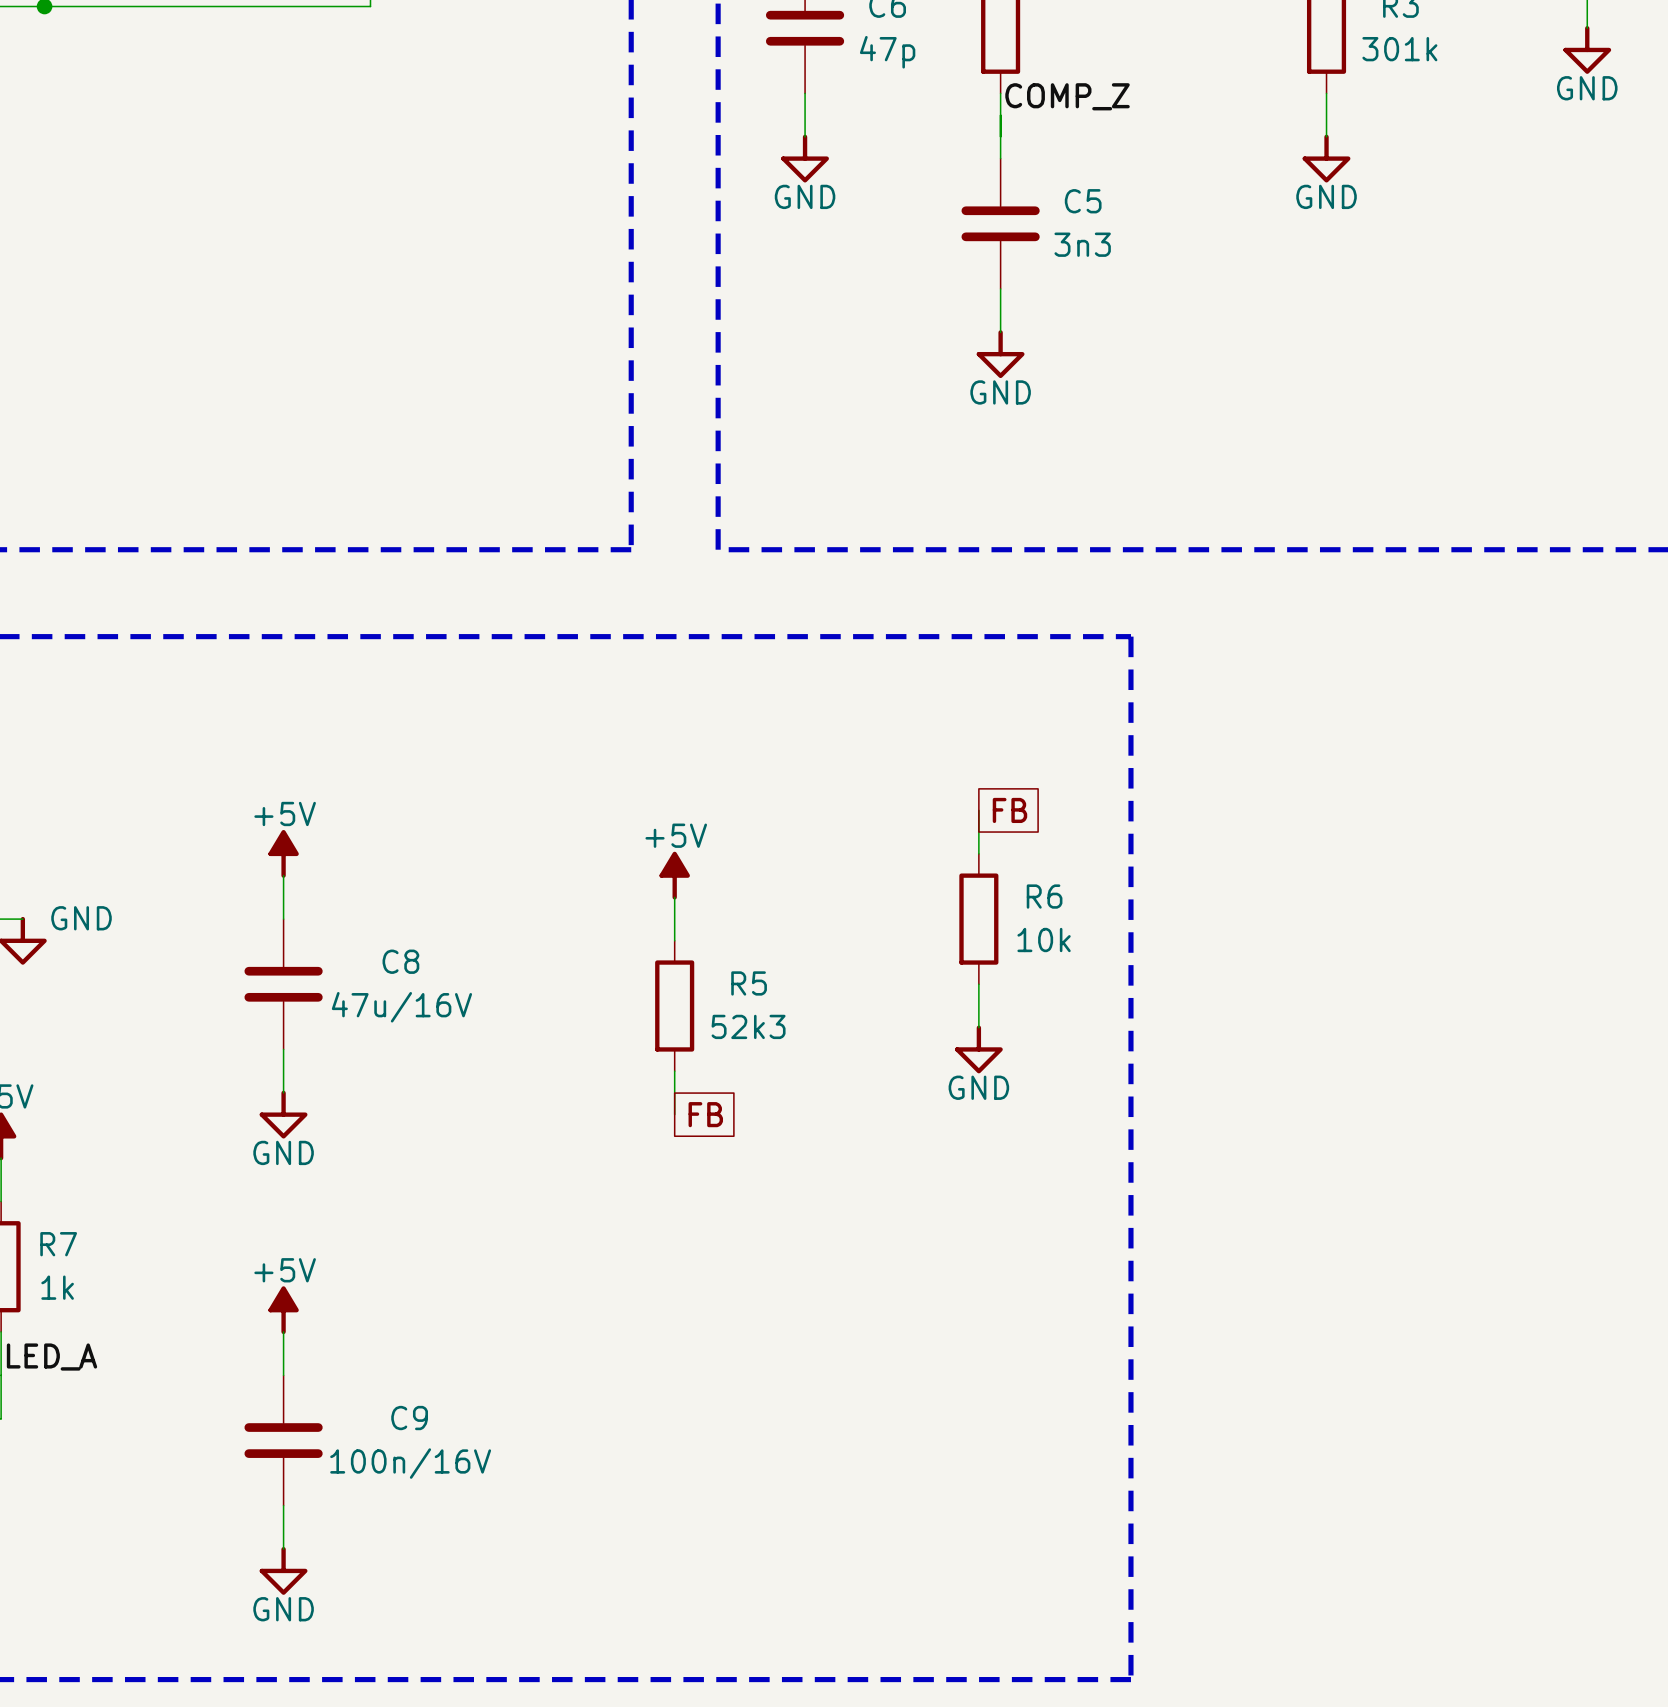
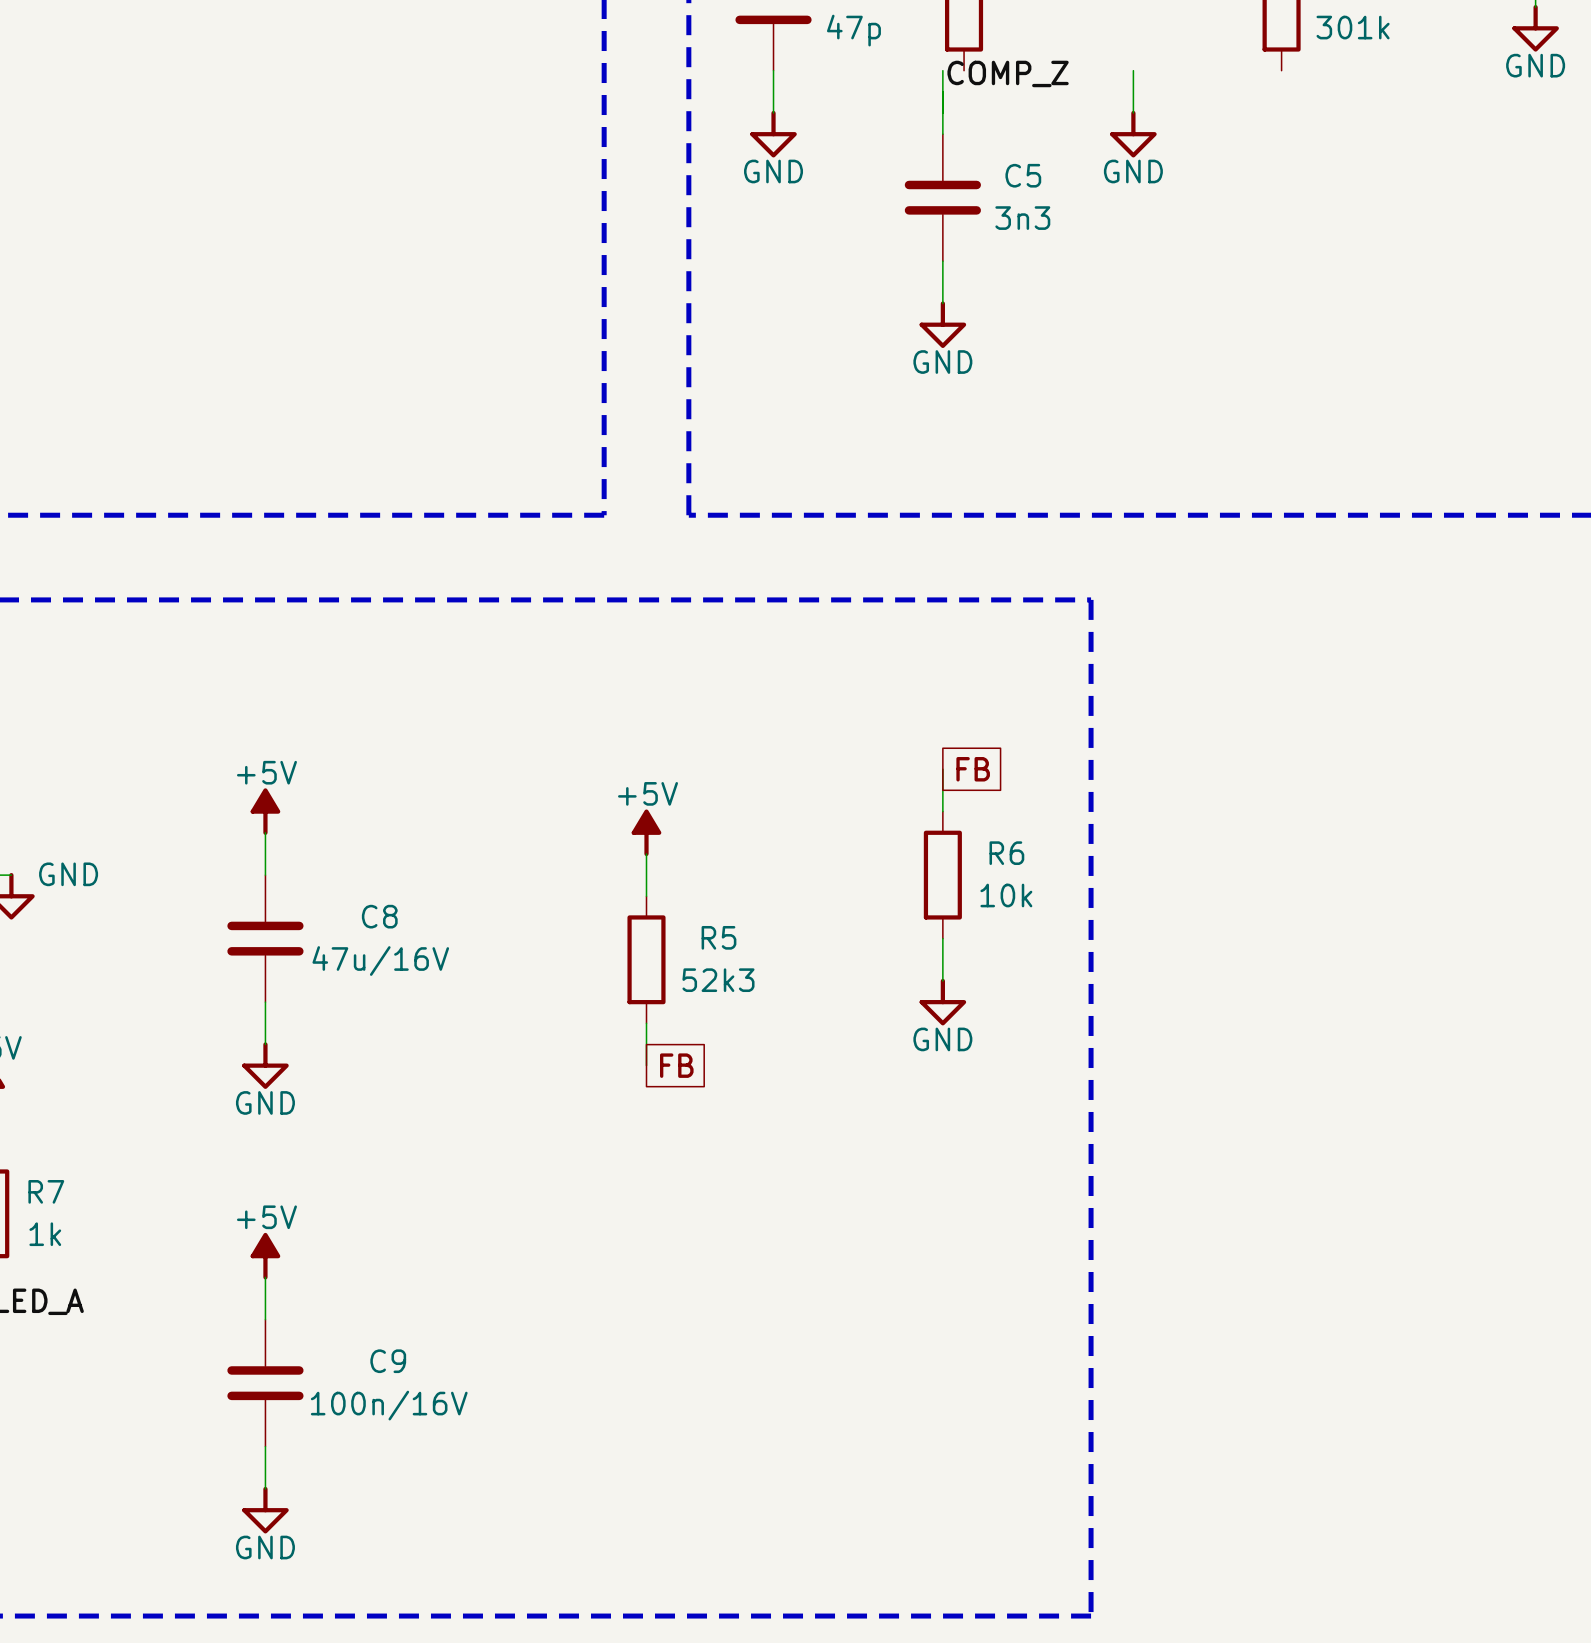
wire: (1000, 93) (1000, 158) -> (942, 70) (942, 134)
wire: (1326, 93) (1326, 136) -> (1133, 70) (1133, 113)
label position: COMP_Z (1067, 96) -> COMP_Z (1008, 73)
power symbol: none -> GND (1133, 134)
power symbol: GND (1326, 158) -> none
C5 position: (1000, 223) -> (942, 197)
wire: (1000, 288) (1000, 332) -> (942, 261) (942, 303)
power symbol position: GND (1000, 354) -> GND (942, 324)

